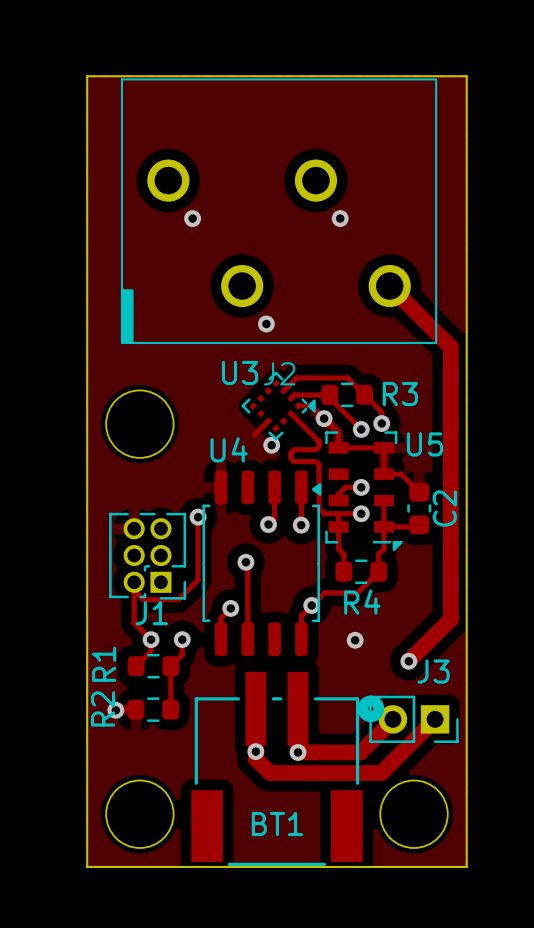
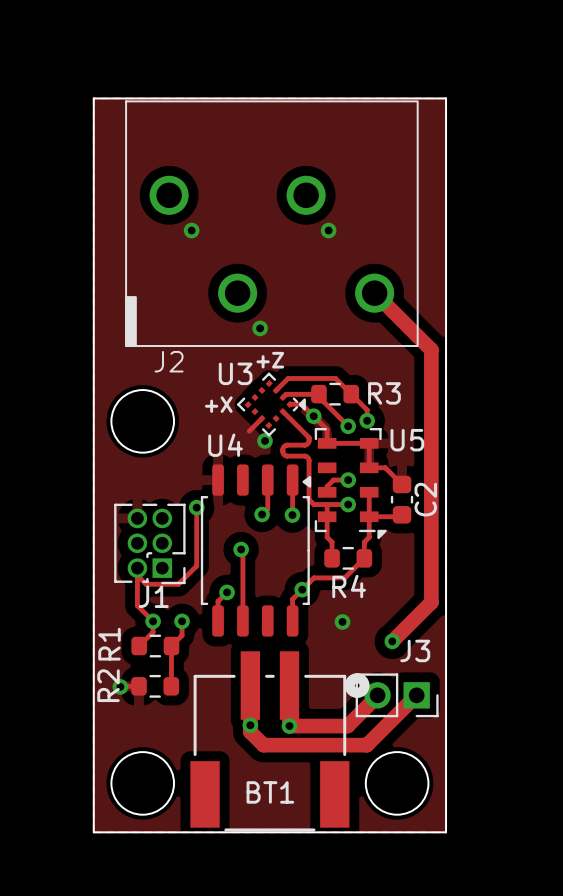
text: none -> +Z (270, 360)
J2 name position: J2 (279, 373) -> J2 (169, 361)
text: none -> +X (218, 404)

